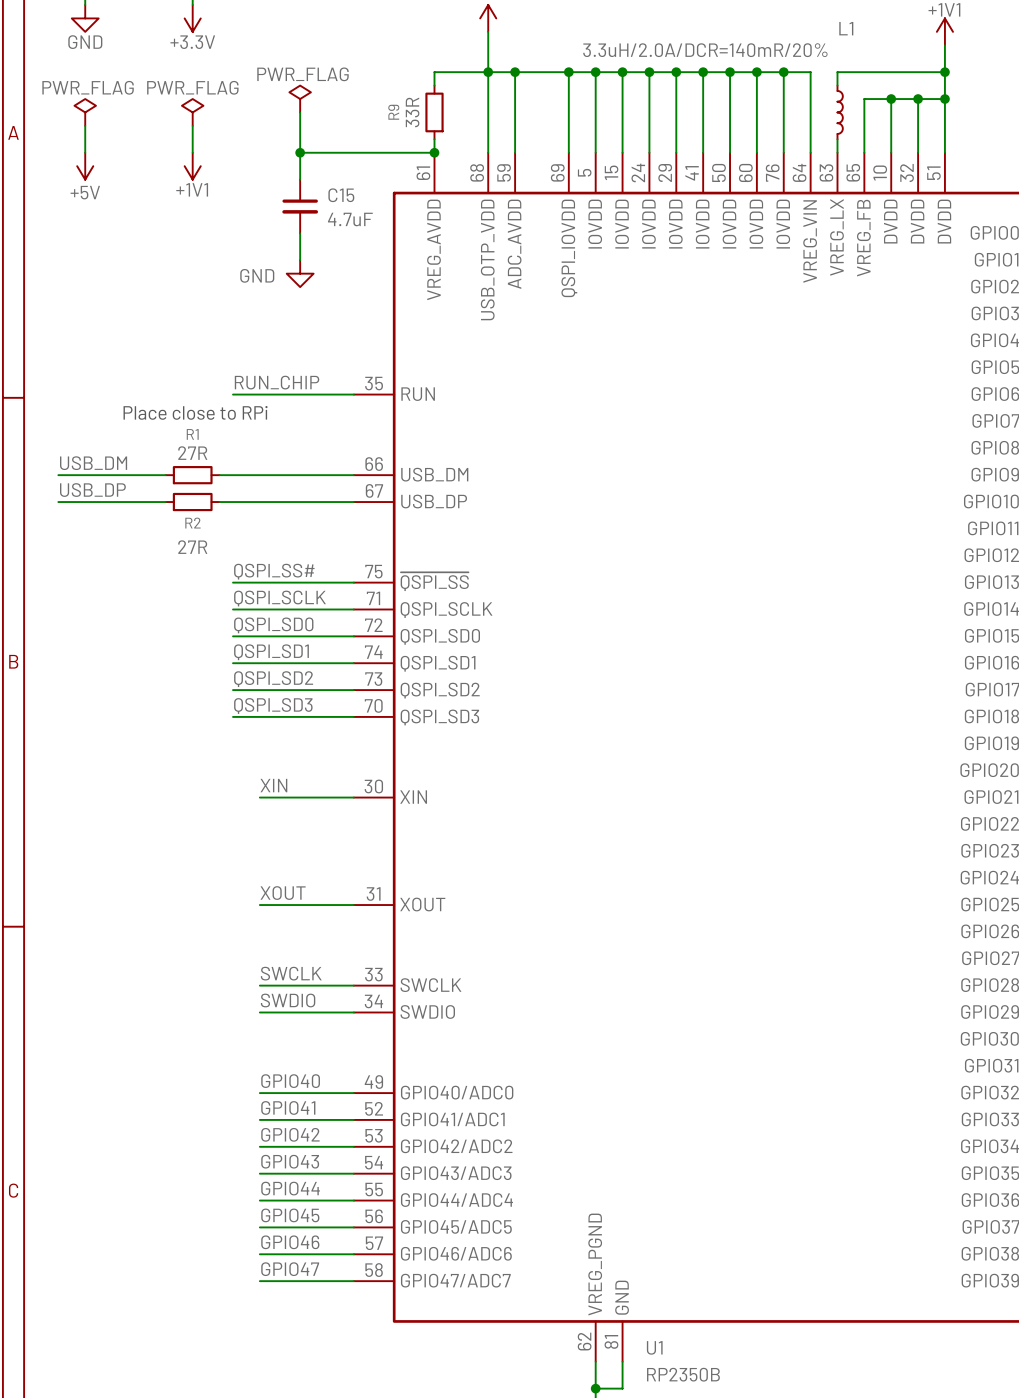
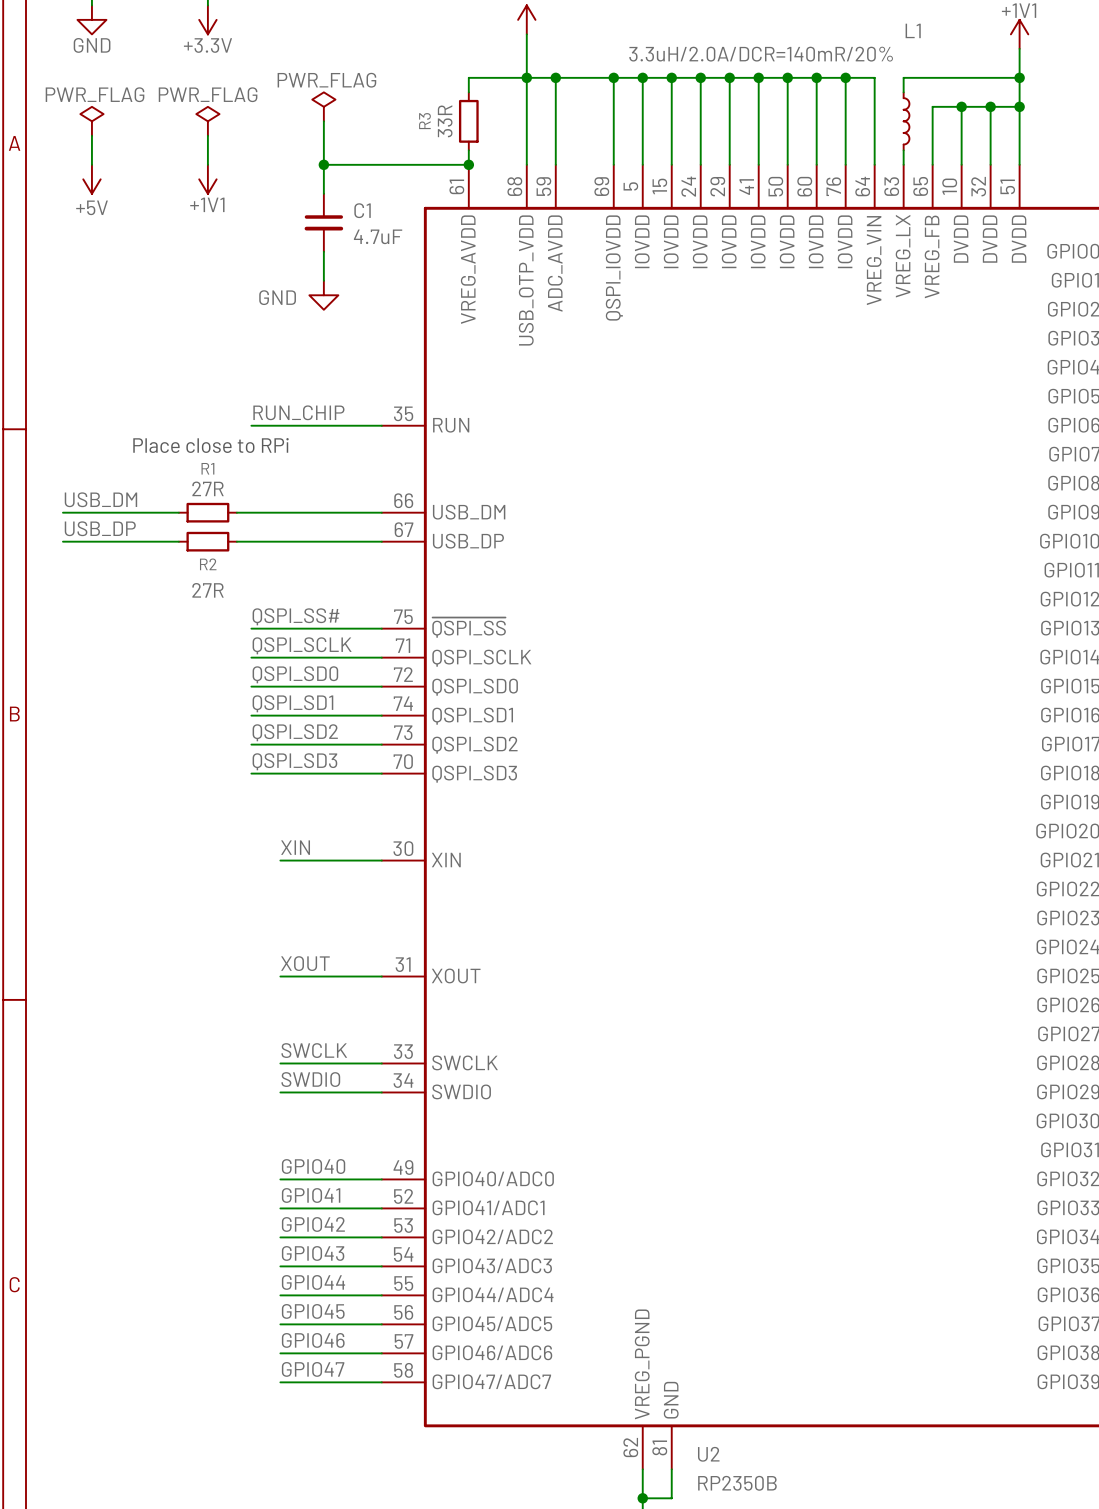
R9 name: R9 (393, 112) -> R3 (424, 121)
C15 name: C15 (341, 195) -> C1 (362, 210)
U1 name: U1 (654, 1347) -> U2 (708, 1454)

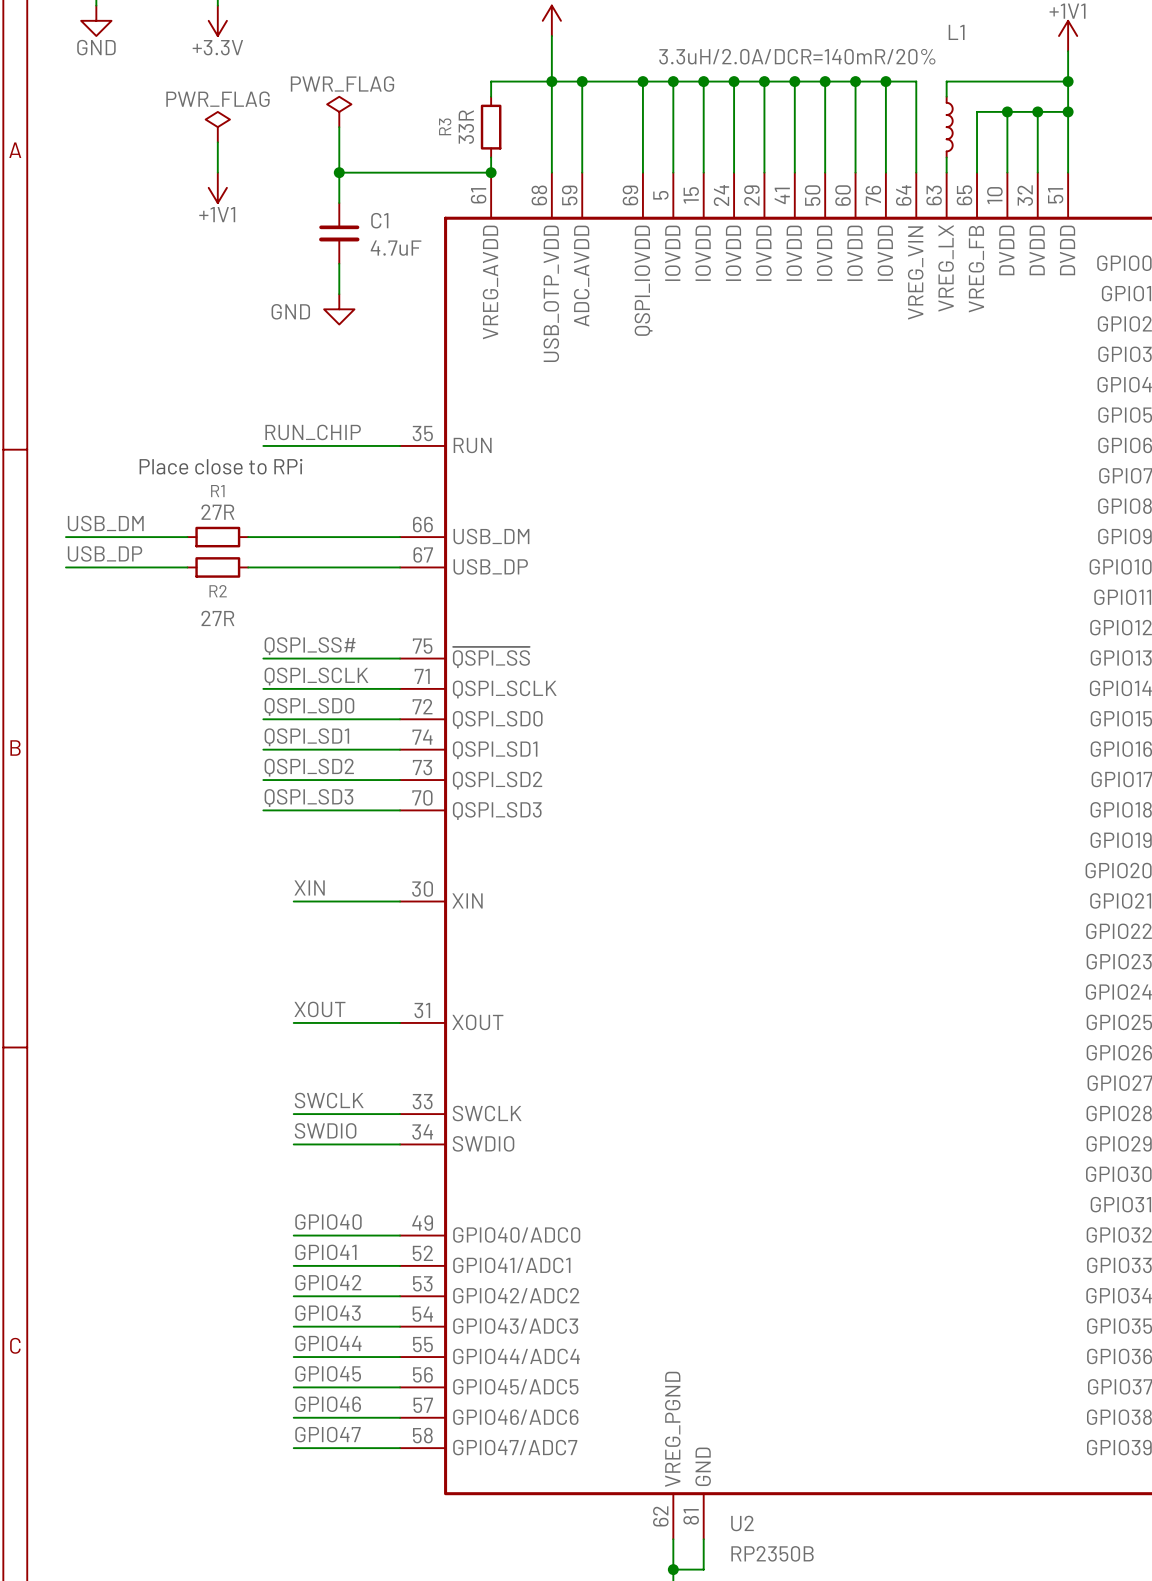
power symbol: PWR_FLAG (91, 121) -> none
wire: (91, 135) (91, 164) -> none
power symbol: +5V (91, 179) -> none

